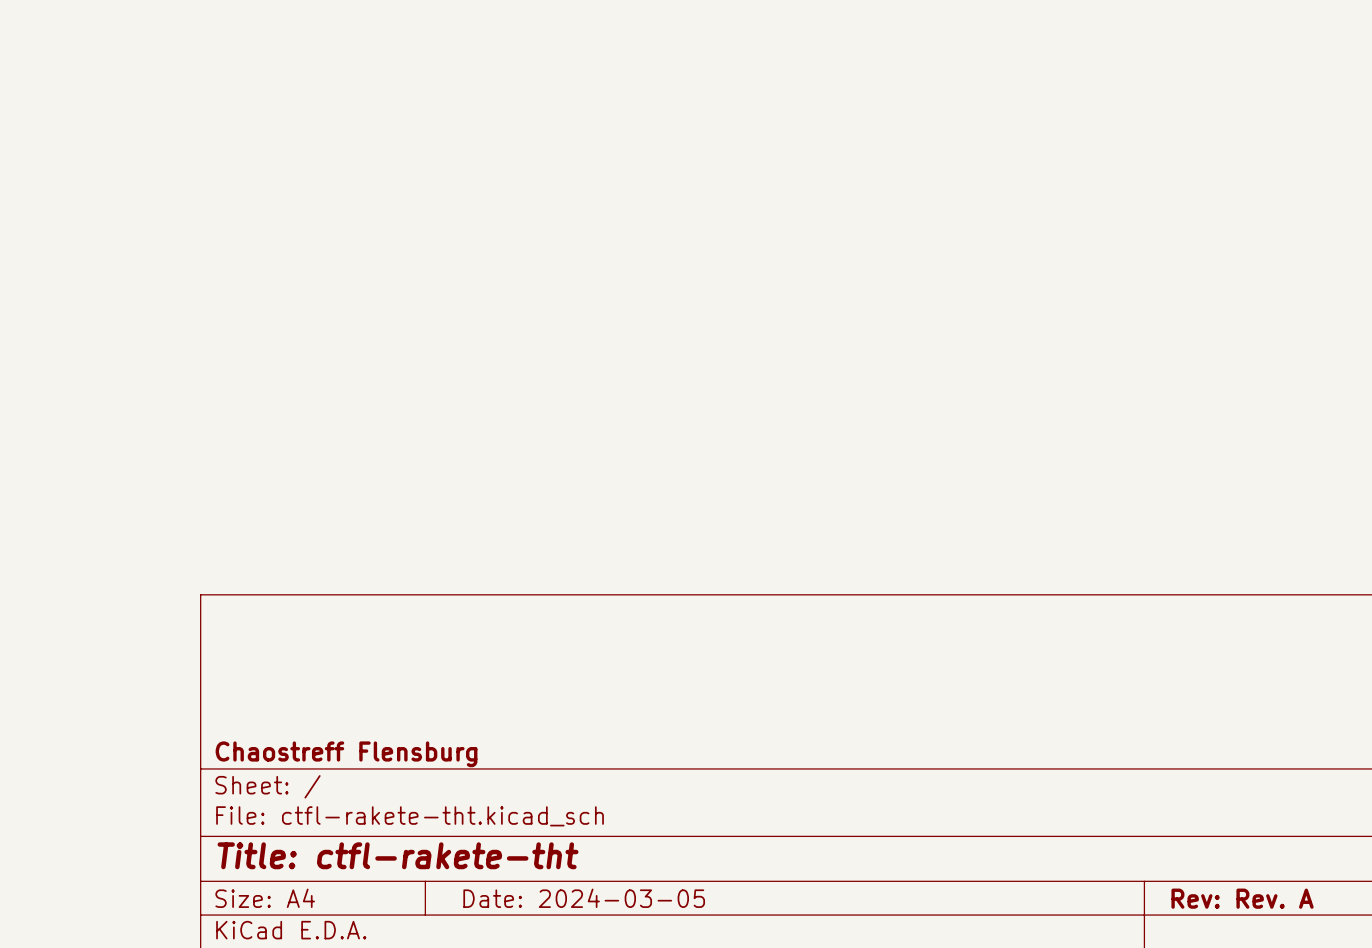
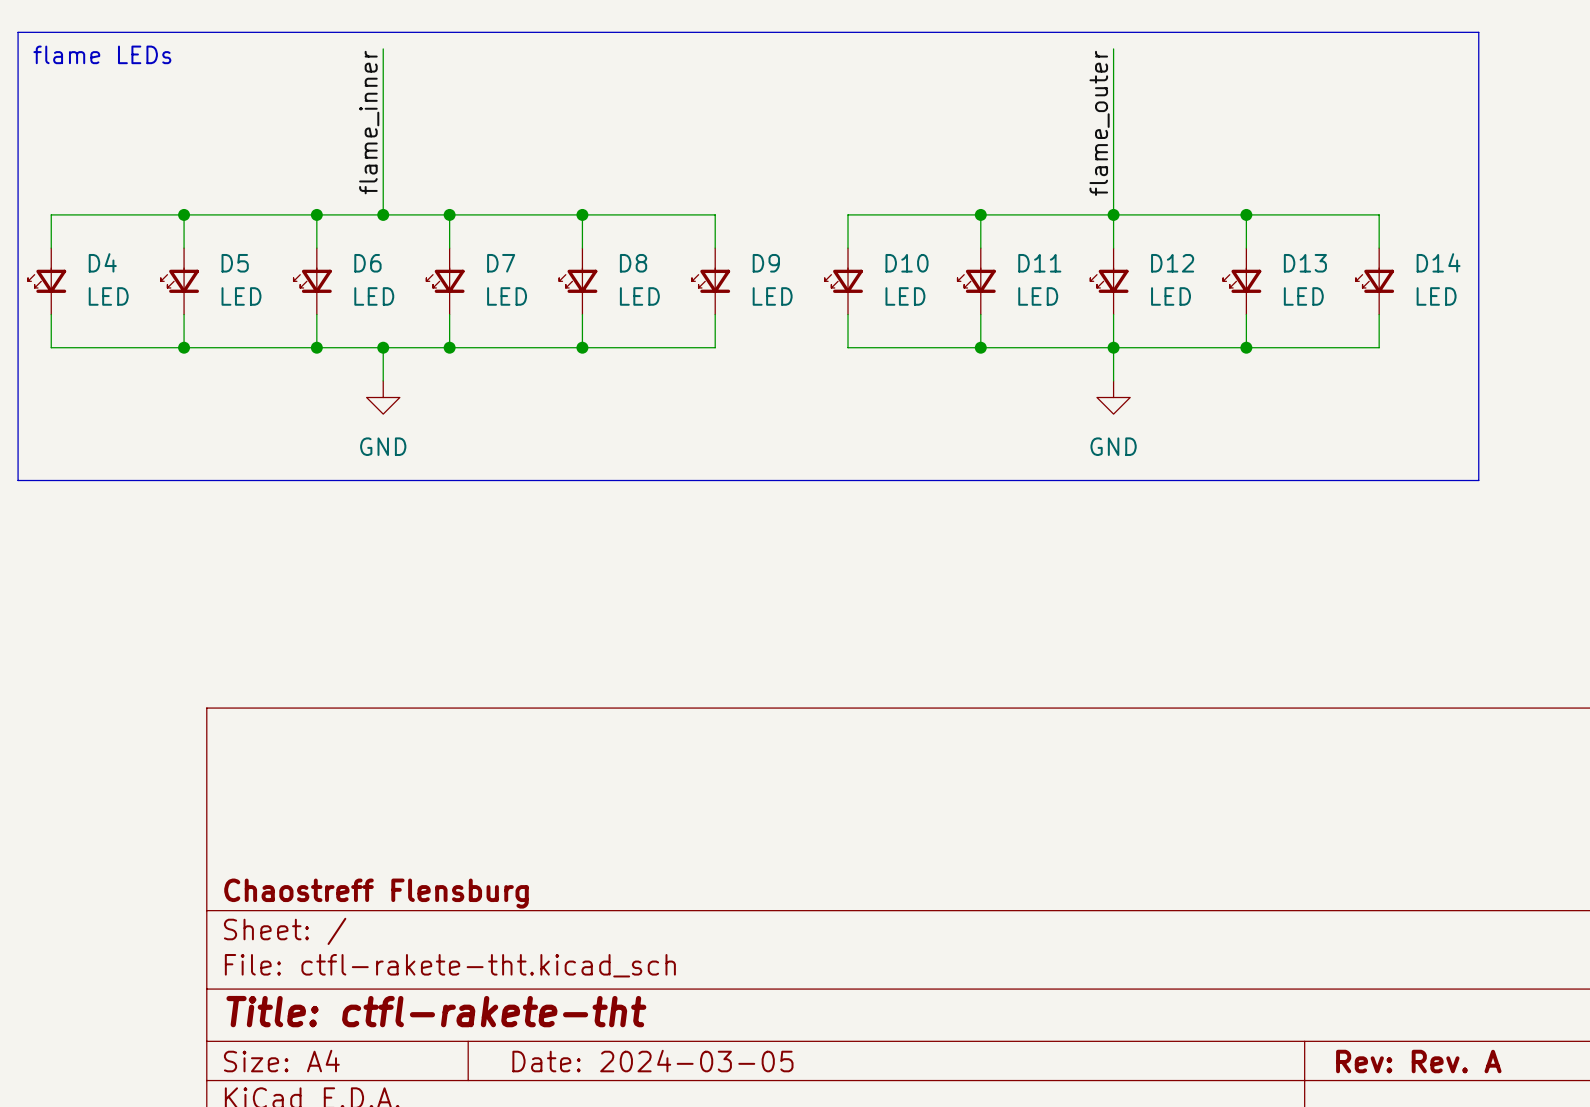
line: none -> (18, 32) (1478, 32) (1478, 480) (18, 480) (18, 32)
wire: none -> (383, 48) (383, 214)
wire: none -> (1113, 48) (1113, 248)
text: none -> flame LEDs (102, 54)
label: none -> flame_inner (369, 122)
label: none -> flame_outer (1099, 123)
wire: none -> (184, 214) (184, 248)
junction: none -> (184, 214)
wire: none -> (316, 214) (316, 248)
junction: none -> (316, 214)
junction: none -> (383, 214)
wire: none -> (449, 214) (449, 248)
junction: none -> (449, 214)
wire: none -> (582, 214) (582, 248)
junction: none -> (582, 214)
wire: none -> (980, 214) (980, 248)
junction: none -> (980, 214)
junction: none -> (1113, 214)
wire: none -> (1246, 214) (1246, 248)
junction: none -> (1246, 214)
wire: none -> (51, 248) (51, 214) (715, 214) (715, 248)
wire: none -> (848, 248) (848, 214) (1379, 214) (1379, 248)
D4: none -> LED (47, 281)
D5: none -> LED (179, 281)
D6: none -> LED (312, 281)
D7: none -> LED (445, 281)
D8: none -> LED (578, 281)
D9: none -> LED (711, 281)
D10: none -> LED (843, 281)
D11: none -> LED (976, 281)
D12: none -> LED (1109, 281)
D13: none -> LED (1242, 281)
D14: none -> LED (1375, 281)
wire: none -> (51, 314) (51, 347) (715, 347) (715, 314)
wire: none -> (184, 314) (184, 347)
wire: none -> (316, 314) (316, 347)
wire: none -> (449, 314) (449, 347)
wire: none -> (582, 314) (582, 347)
wire: none -> (848, 314) (848, 347) (1379, 347) (1379, 314)
wire: none -> (980, 314) (980, 347)
wire: none -> (1113, 314) (1113, 380)
wire: none -> (1246, 314) (1246, 347)
junction: none -> (184, 347)
junction: none -> (316, 347)
wire: none -> (383, 347) (383, 380)
junction: none -> (383, 347)
junction: none -> (449, 347)
junction: none -> (582, 347)
junction: none -> (980, 347)
junction: none -> (1113, 347)
junction: none -> (1246, 347)
power symbol: none -> GND (383, 397)
power symbol: none -> GND (1113, 397)

